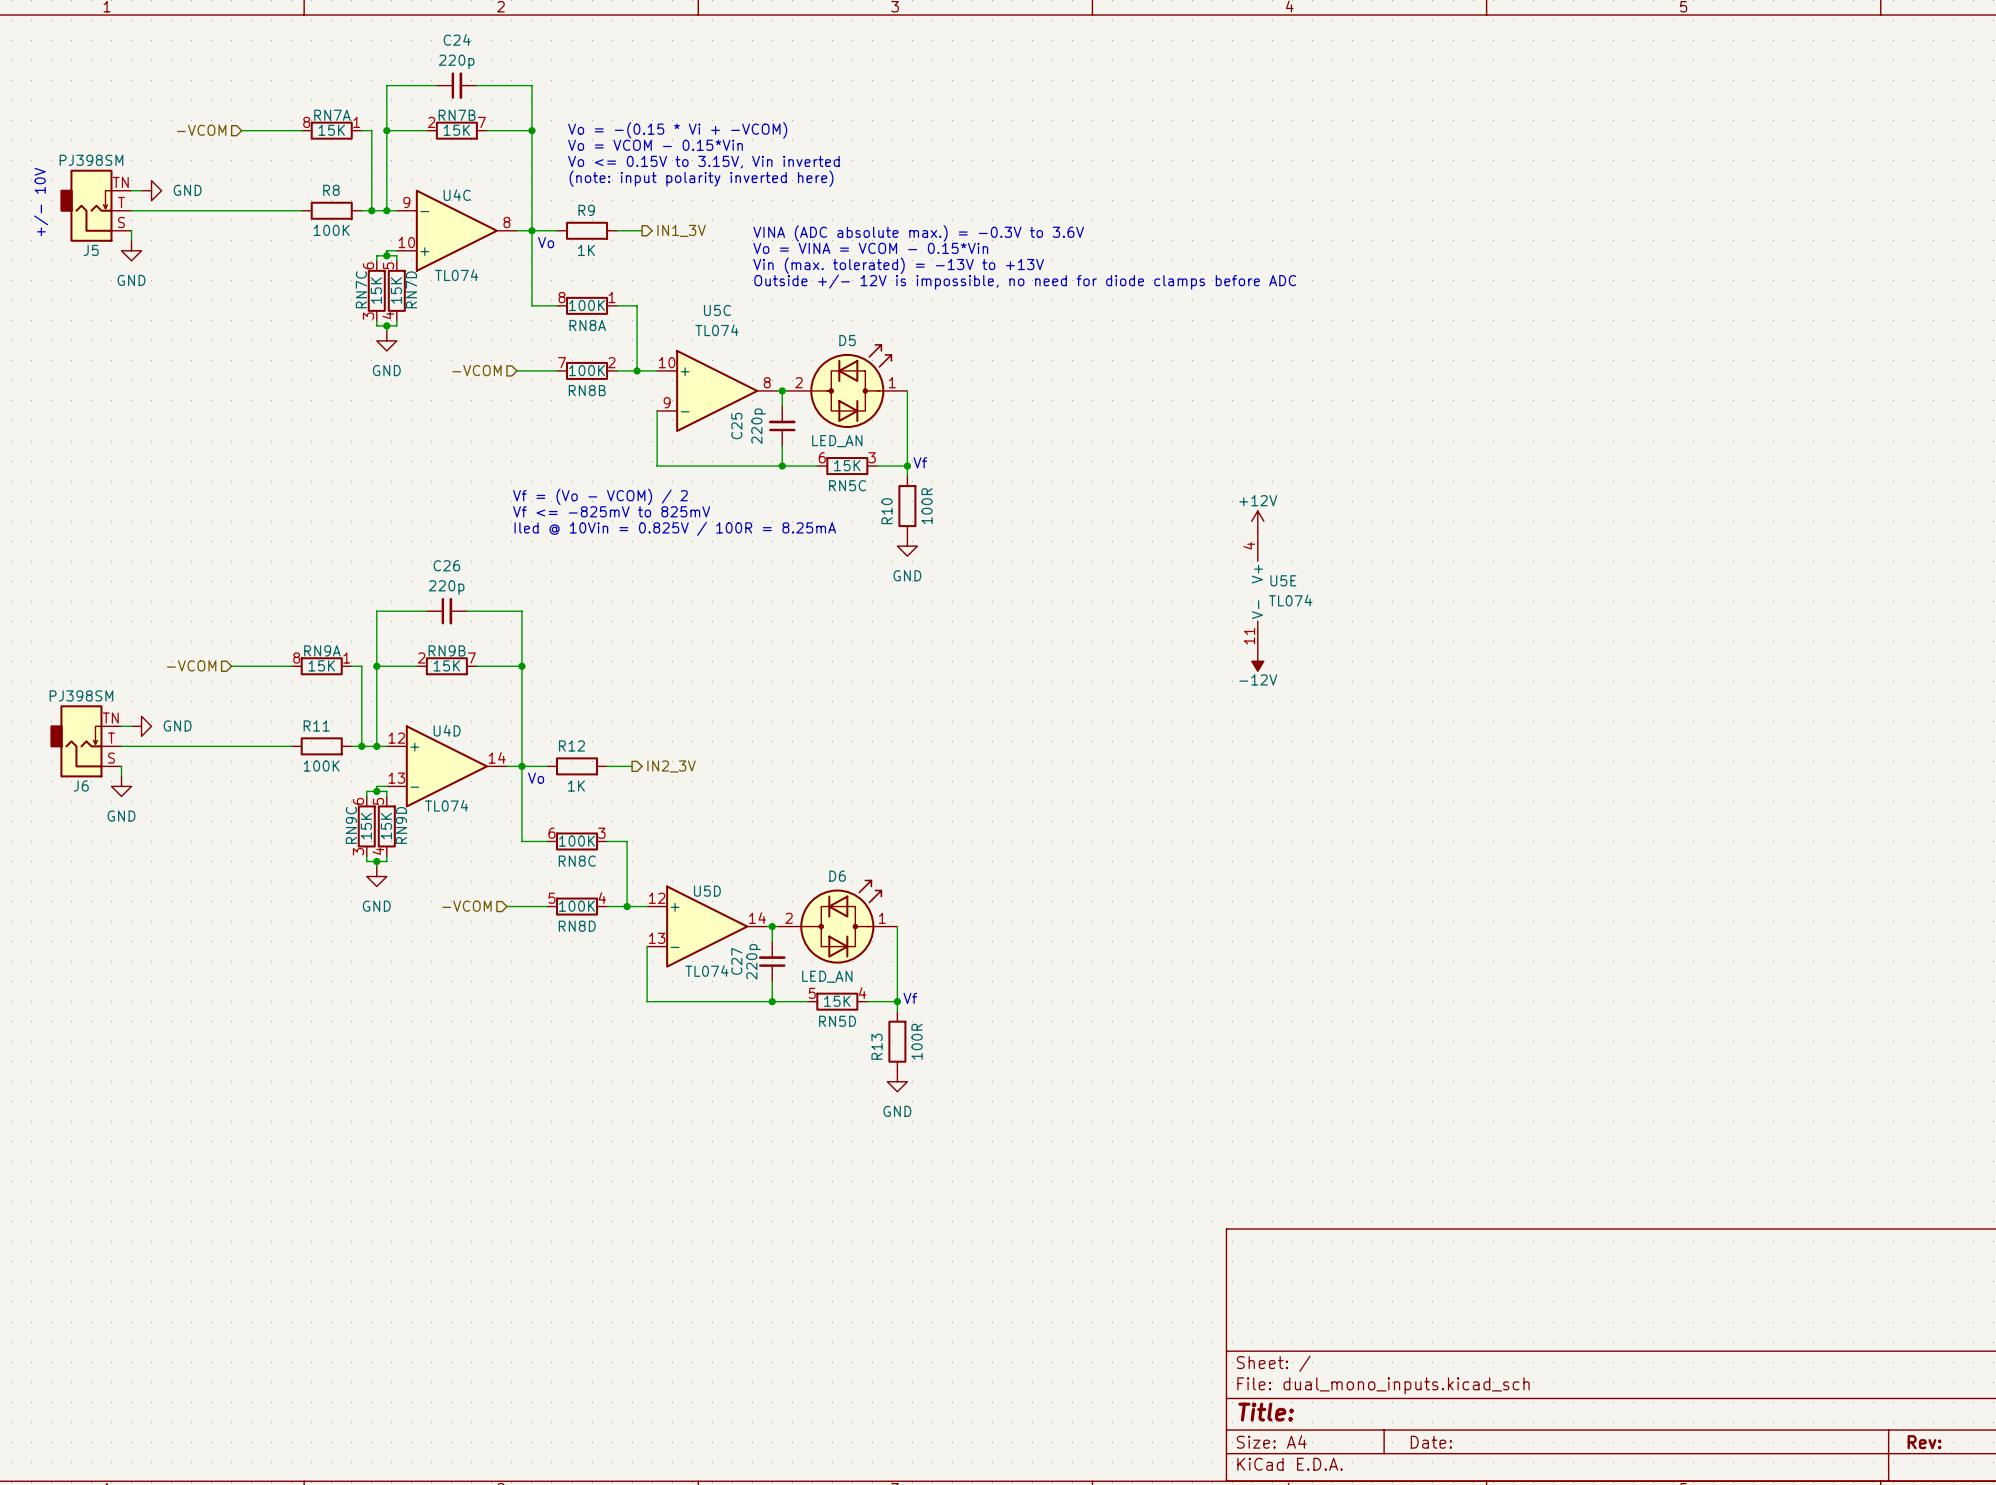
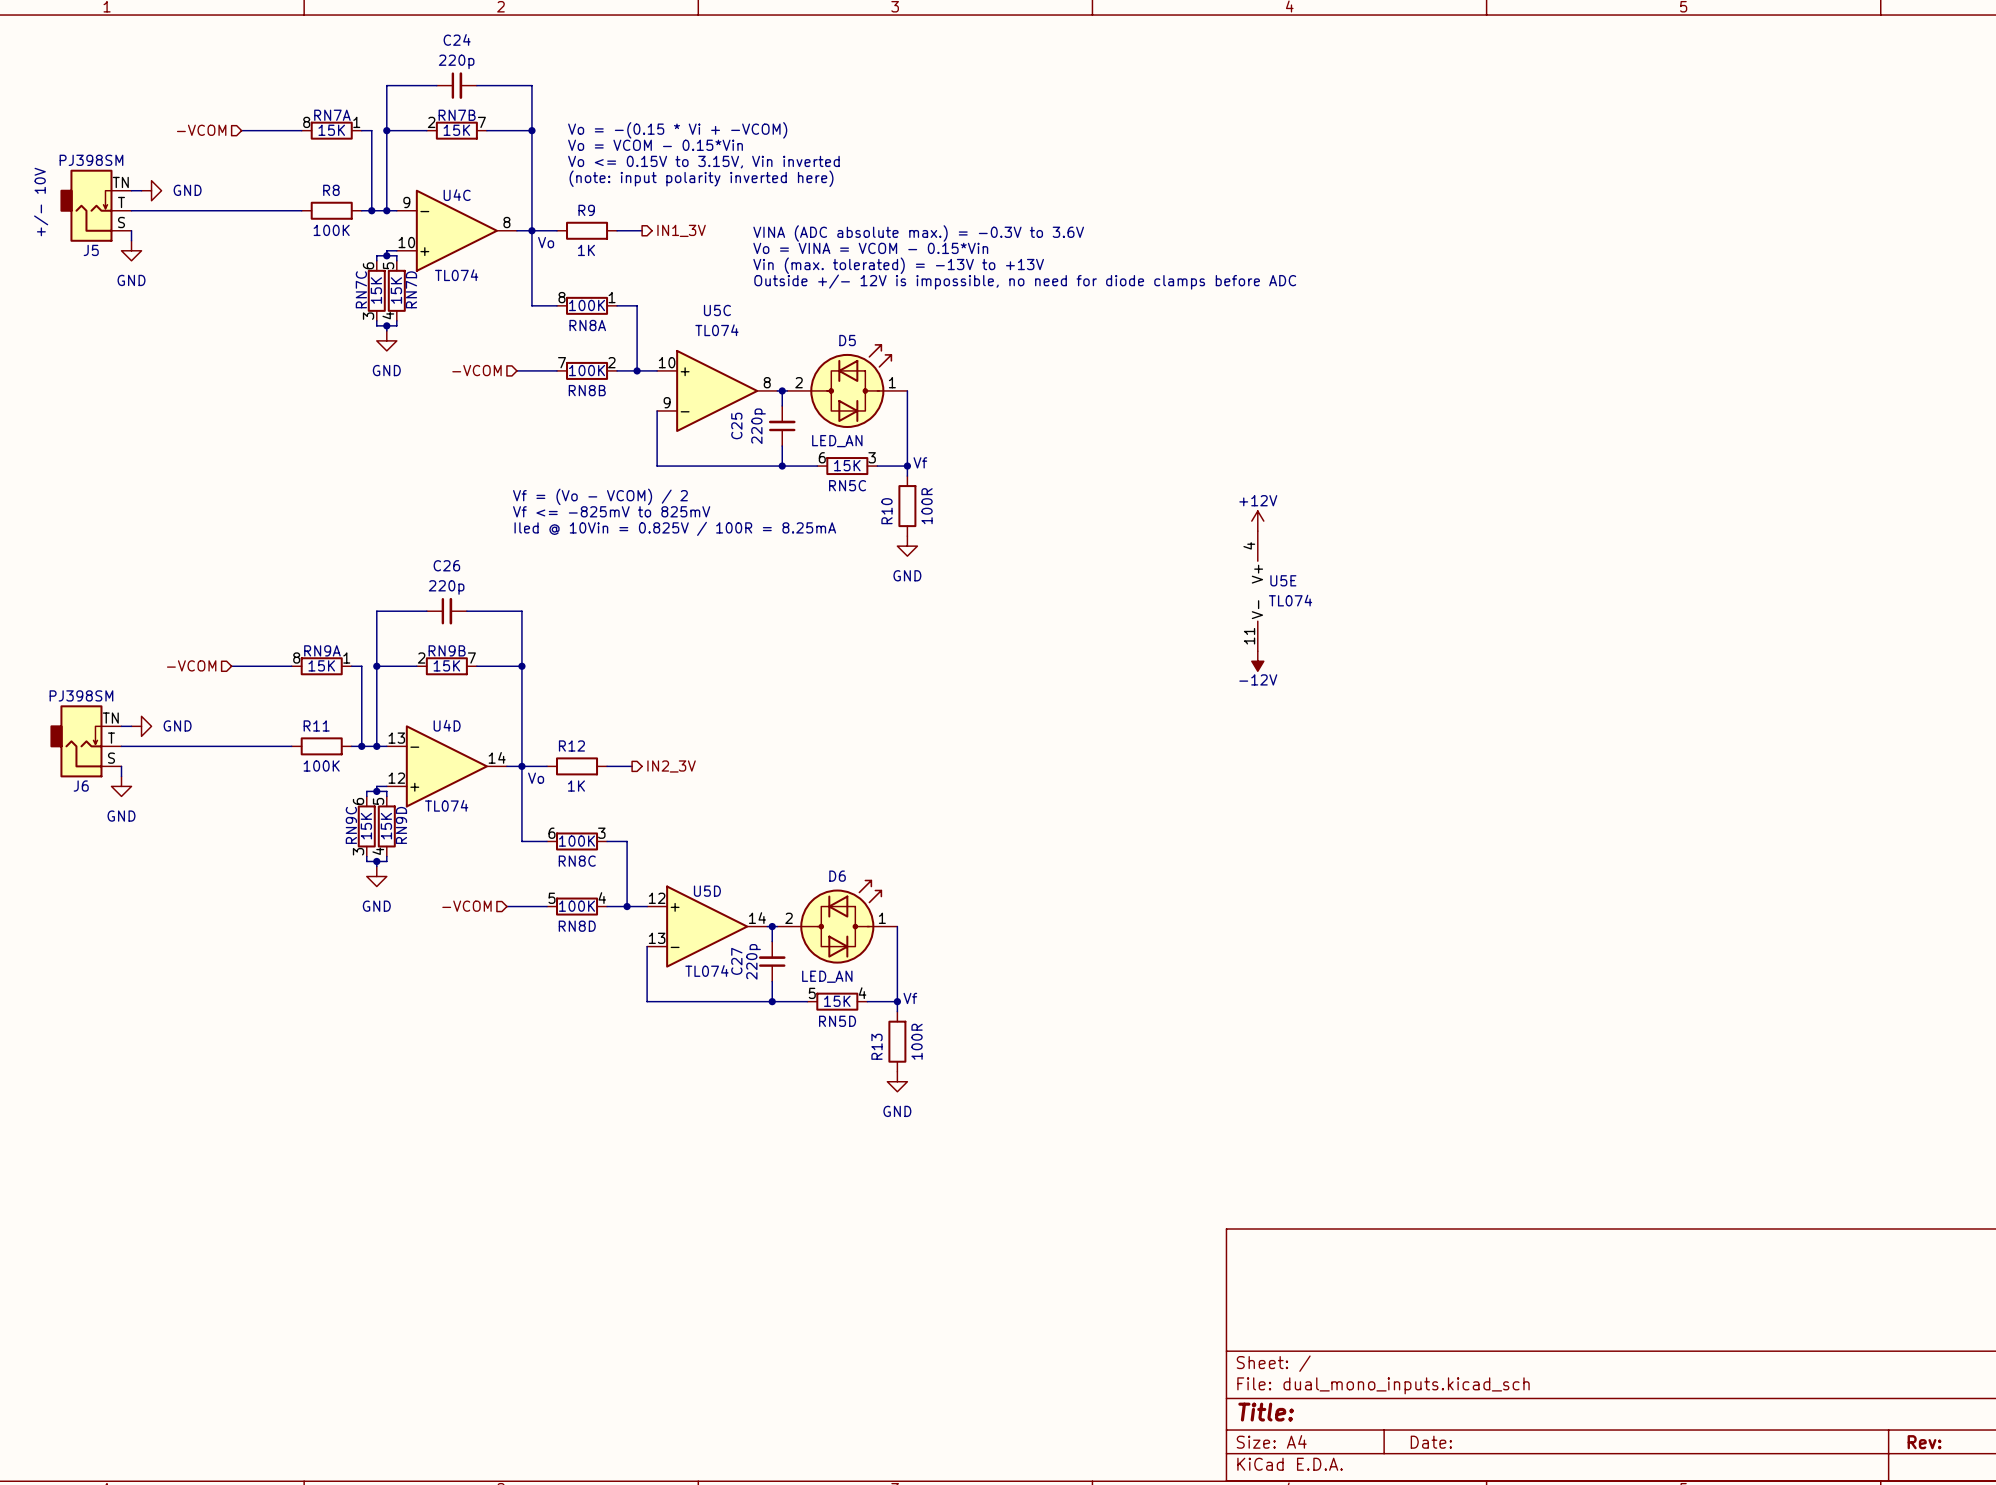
U4D flip: as is (446, 766) -> up-down (446, 766)

